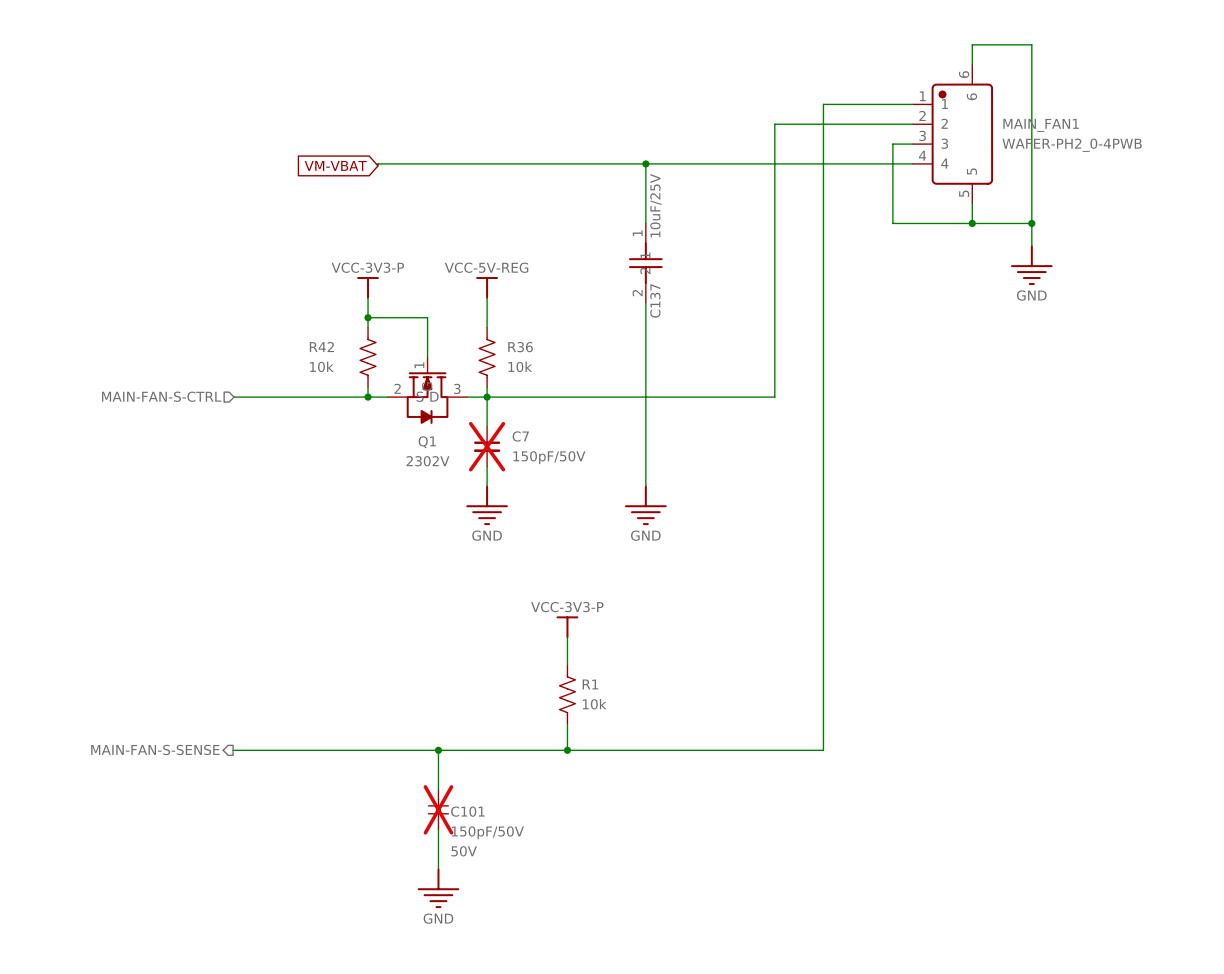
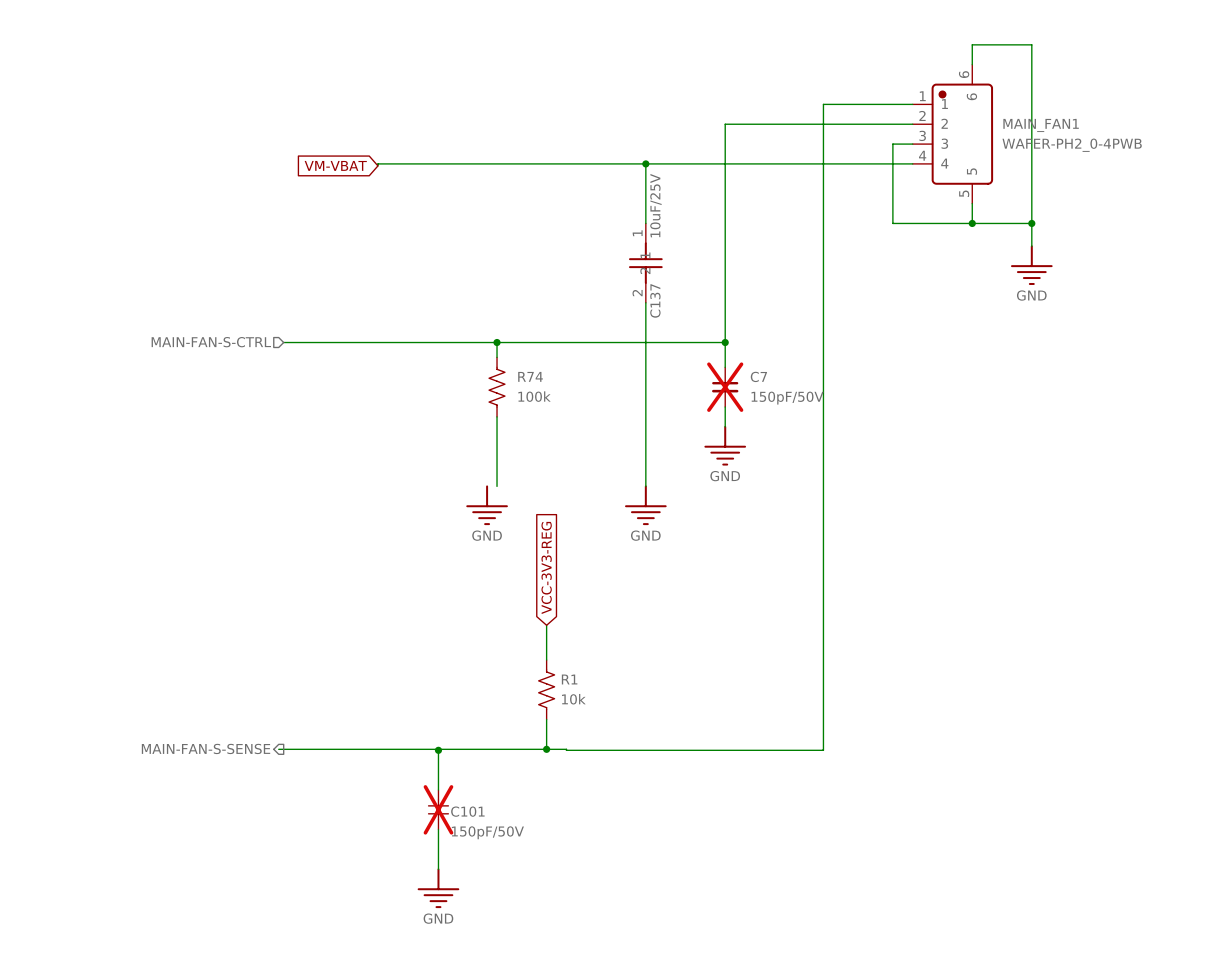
wire: (774, 124) (774, 397) (467, 397) -> (774, 124) (725, 124) (725, 367)
power symbol: VCC-3V3-P (368, 287) -> none
power symbol: VCC-5V-REG (487, 287) -> none
wire: (368, 297) (368, 327) -> none
wire: (487, 297) (487, 327) -> none
wire: (368, 317) (427, 317) (427, 357) -> none
junction: (368, 317) -> none
wire: none -> (283, 342) (725, 342)
wire: none -> (497, 342) (497, 357)
junction: none -> (497, 342)
junction: none -> (725, 342)
R42: 10k (368, 357) -> none
R36: 10k (487, 357) -> none
wire: (368, 387) (368, 397) -> none
wire: (487, 387) (487, 426) -> none
R74: none -> 100k (497, 387)
Q1: 2302V (427, 390) -> none
hierarchical label position: MAIN-FAN-S-CTRL (161, 396) -> MAIN-FAN-S-CTRL (211, 342)
wire: (234, 397) (387, 397) -> none
junction: (368, 397) -> none
junction: (487, 397) -> none
wire: none -> (725, 407) (725, 426)
wire: none -> (497, 416) (497, 486)
power symbol: none -> GND (725, 445)
C7 position: (487, 446) -> (725, 387)
wire: (487, 466) (487, 486) -> none
global label: none -> VCC-3V3-REG (546, 567)
wire: none -> (546, 625) (546, 660)
power symbol: VCC-3V3-P (567, 627) -> none
wire: (567, 637) (567, 664) -> none
R1 position: (567, 694) -> (546, 689)
wire: none -> (546, 719) (546, 749)
wire: (567, 724) (567, 750) -> none
hierarchical label position: MAIN-FAN-S-SENSE (155, 749) -> MAIN-FAN-S-SENSE (206, 748)
wire: (233, 750) (566, 750) -> (278, 749) (566, 750)
junction position: (567, 750) -> (546, 749)
C101 text: 50V (464, 851) -> none

